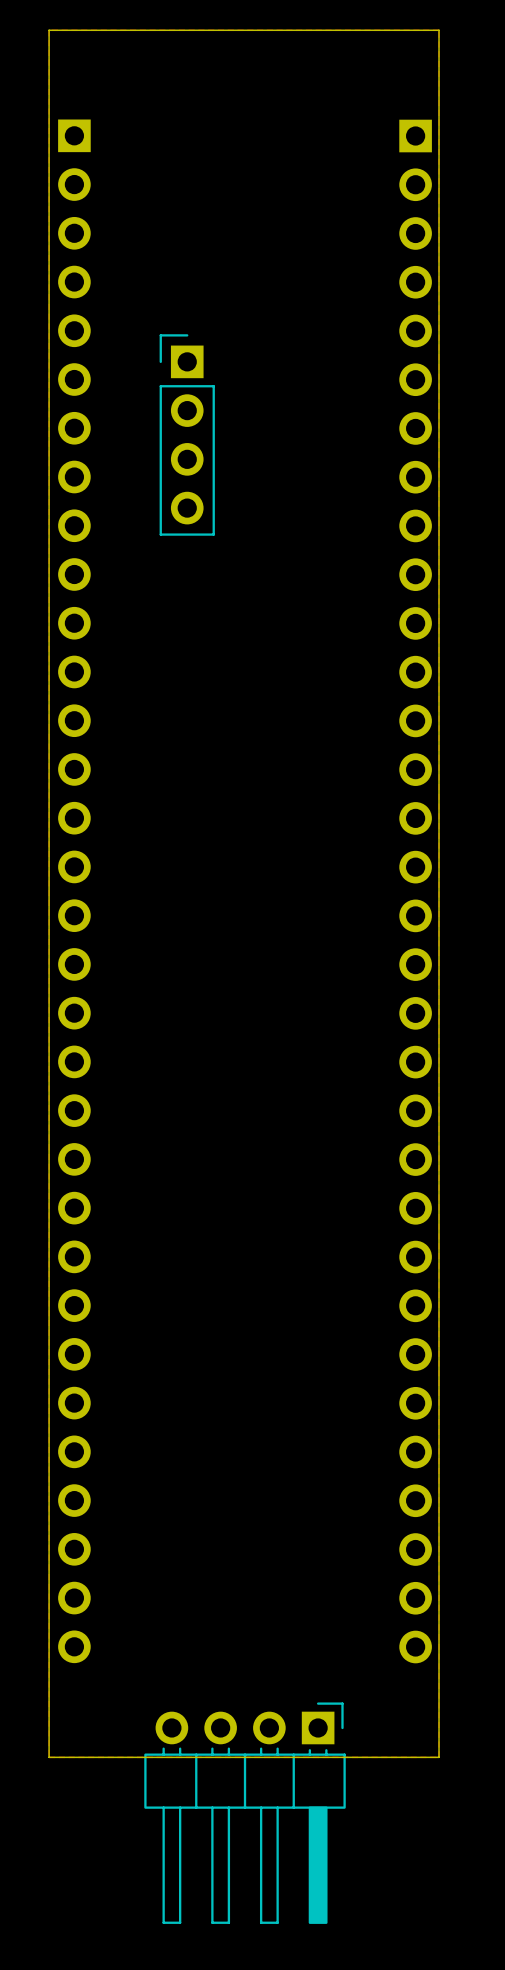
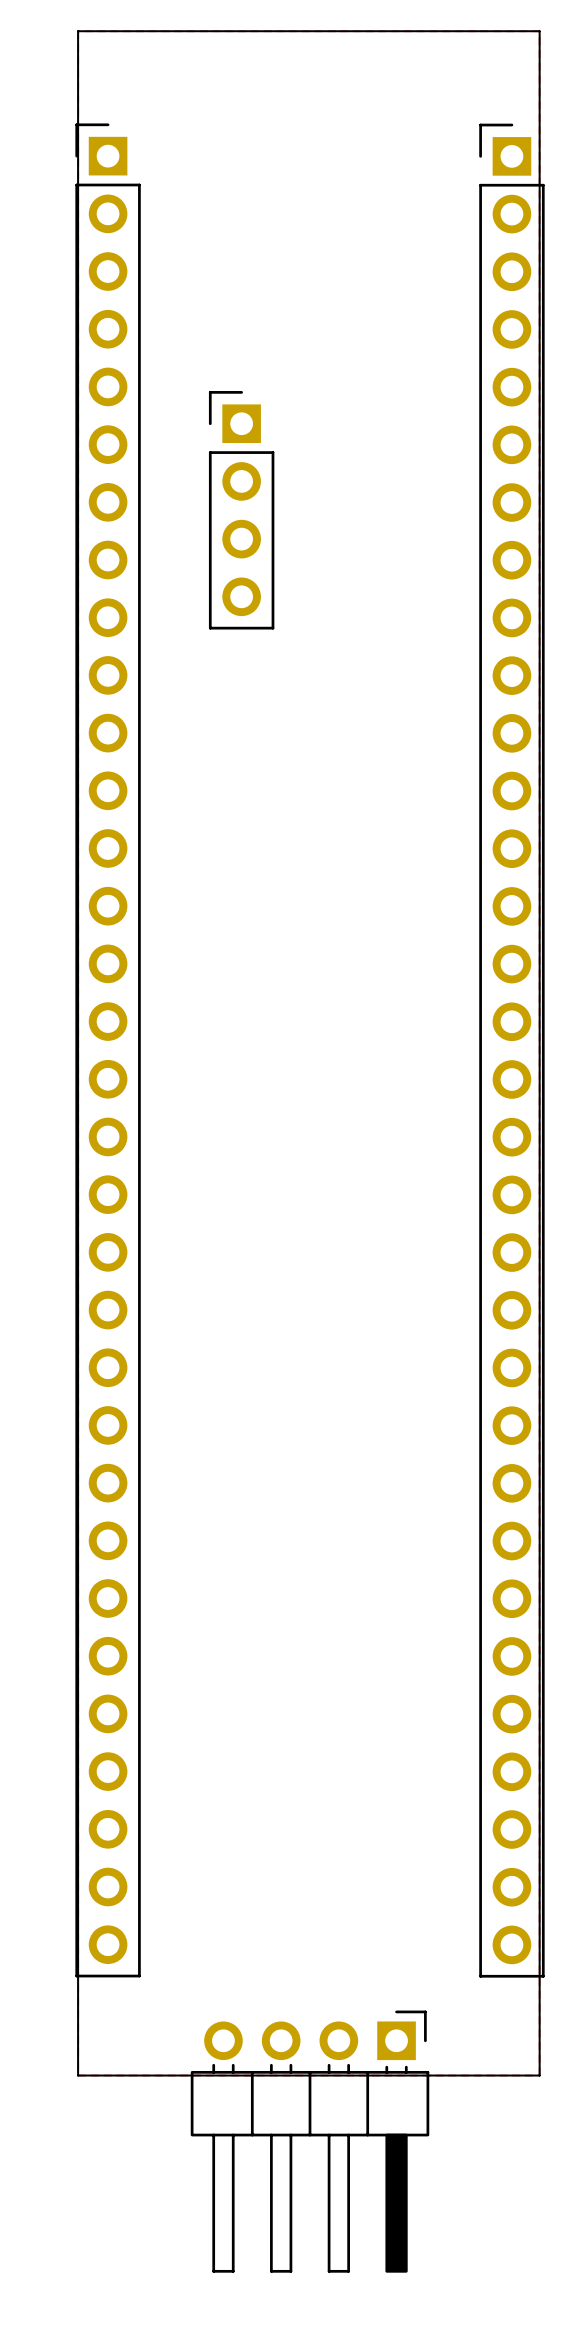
part side: bottom (74, 891) -> top (108, 1050)
part side: bottom (415, 891) -> top (511, 1050)

